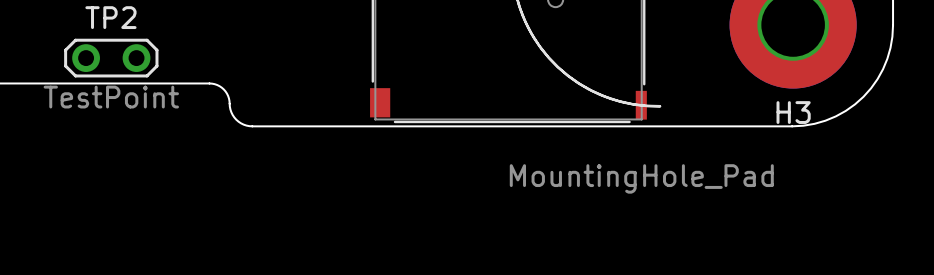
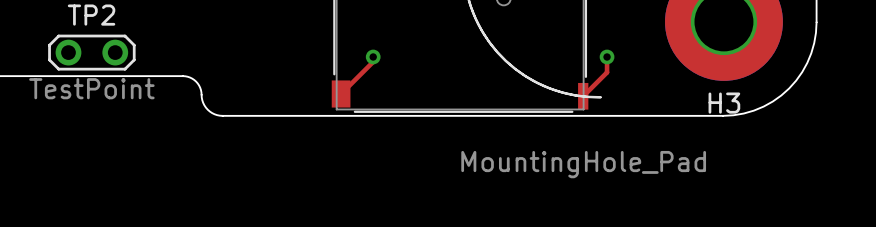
top track: none -> (373, 56) (373, 61) (341, 93)
via: none -> (373, 56)
top track: none -> (607, 56) (607, 72) (583, 96)
via: none -> (607, 56)

